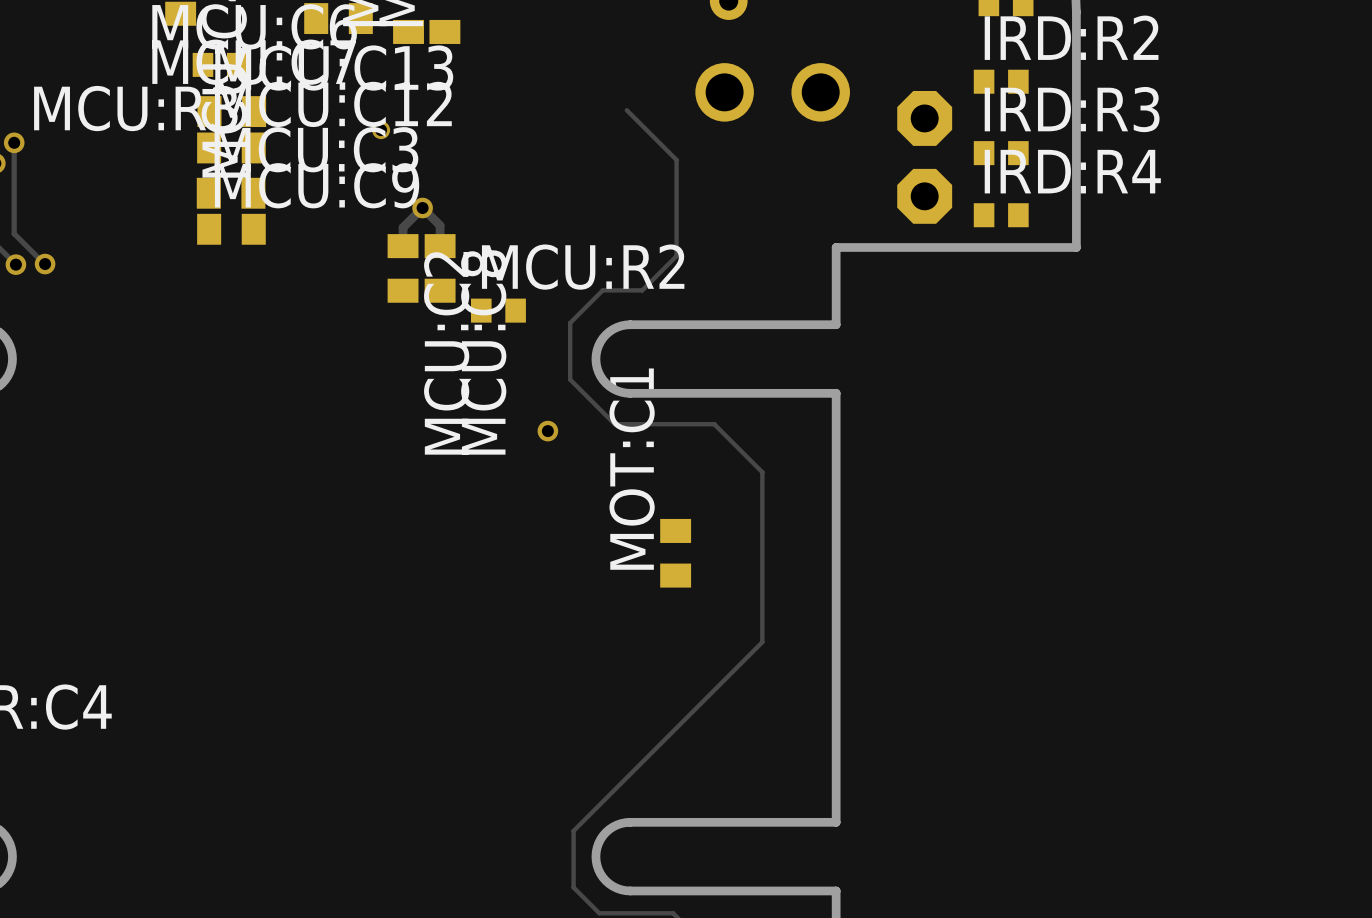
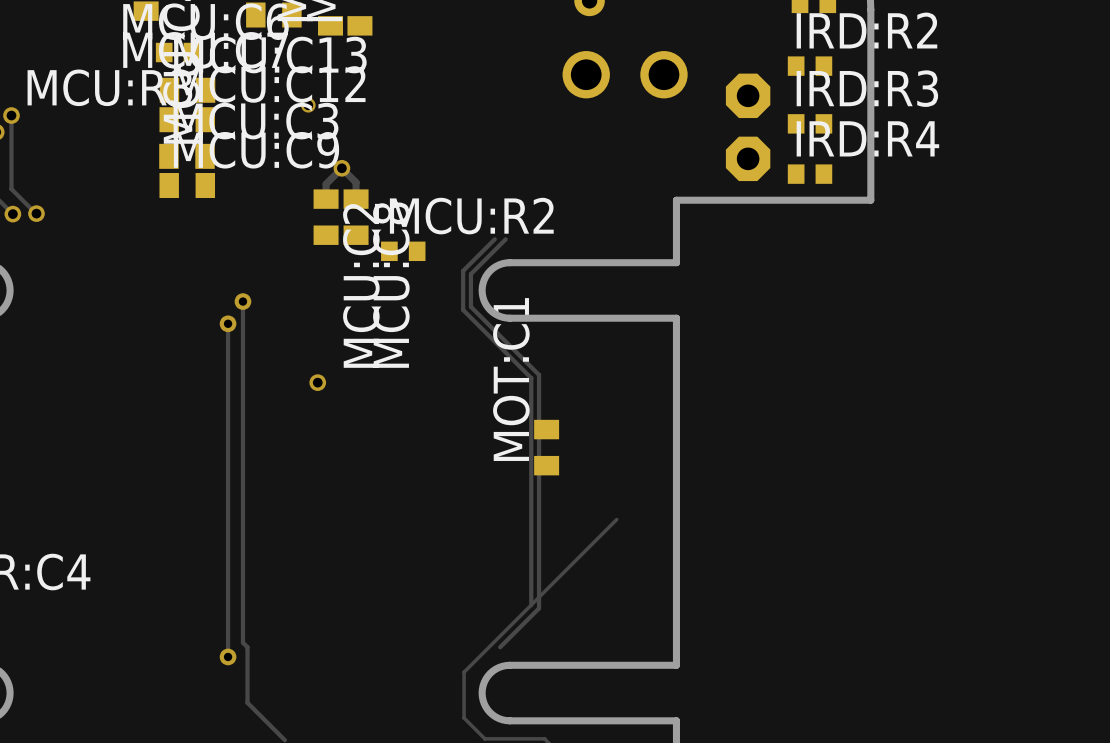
track: (626, 110) (676, 159) (676, 256) (642, 290) (602, 290) (570, 322) (570, 379) (614, 424) (714, 424) (762, 472) (762, 642) -> none
track: none -> (494, 239) (463, 270) (463, 310) (531, 378) (531, 605)
track: none -> (505, 239) (470, 274) (470, 306) (539, 374) (539, 608) (500, 647)
track: none -> (242, 301) (242, 642) (247, 647) (247, 702) (284, 740)
via: none -> (242, 301)
track: none -> (228, 323) (228, 656)
via: none -> (228, 323)
via position: (547, 431) -> (317, 382)
via: none -> (228, 656)

